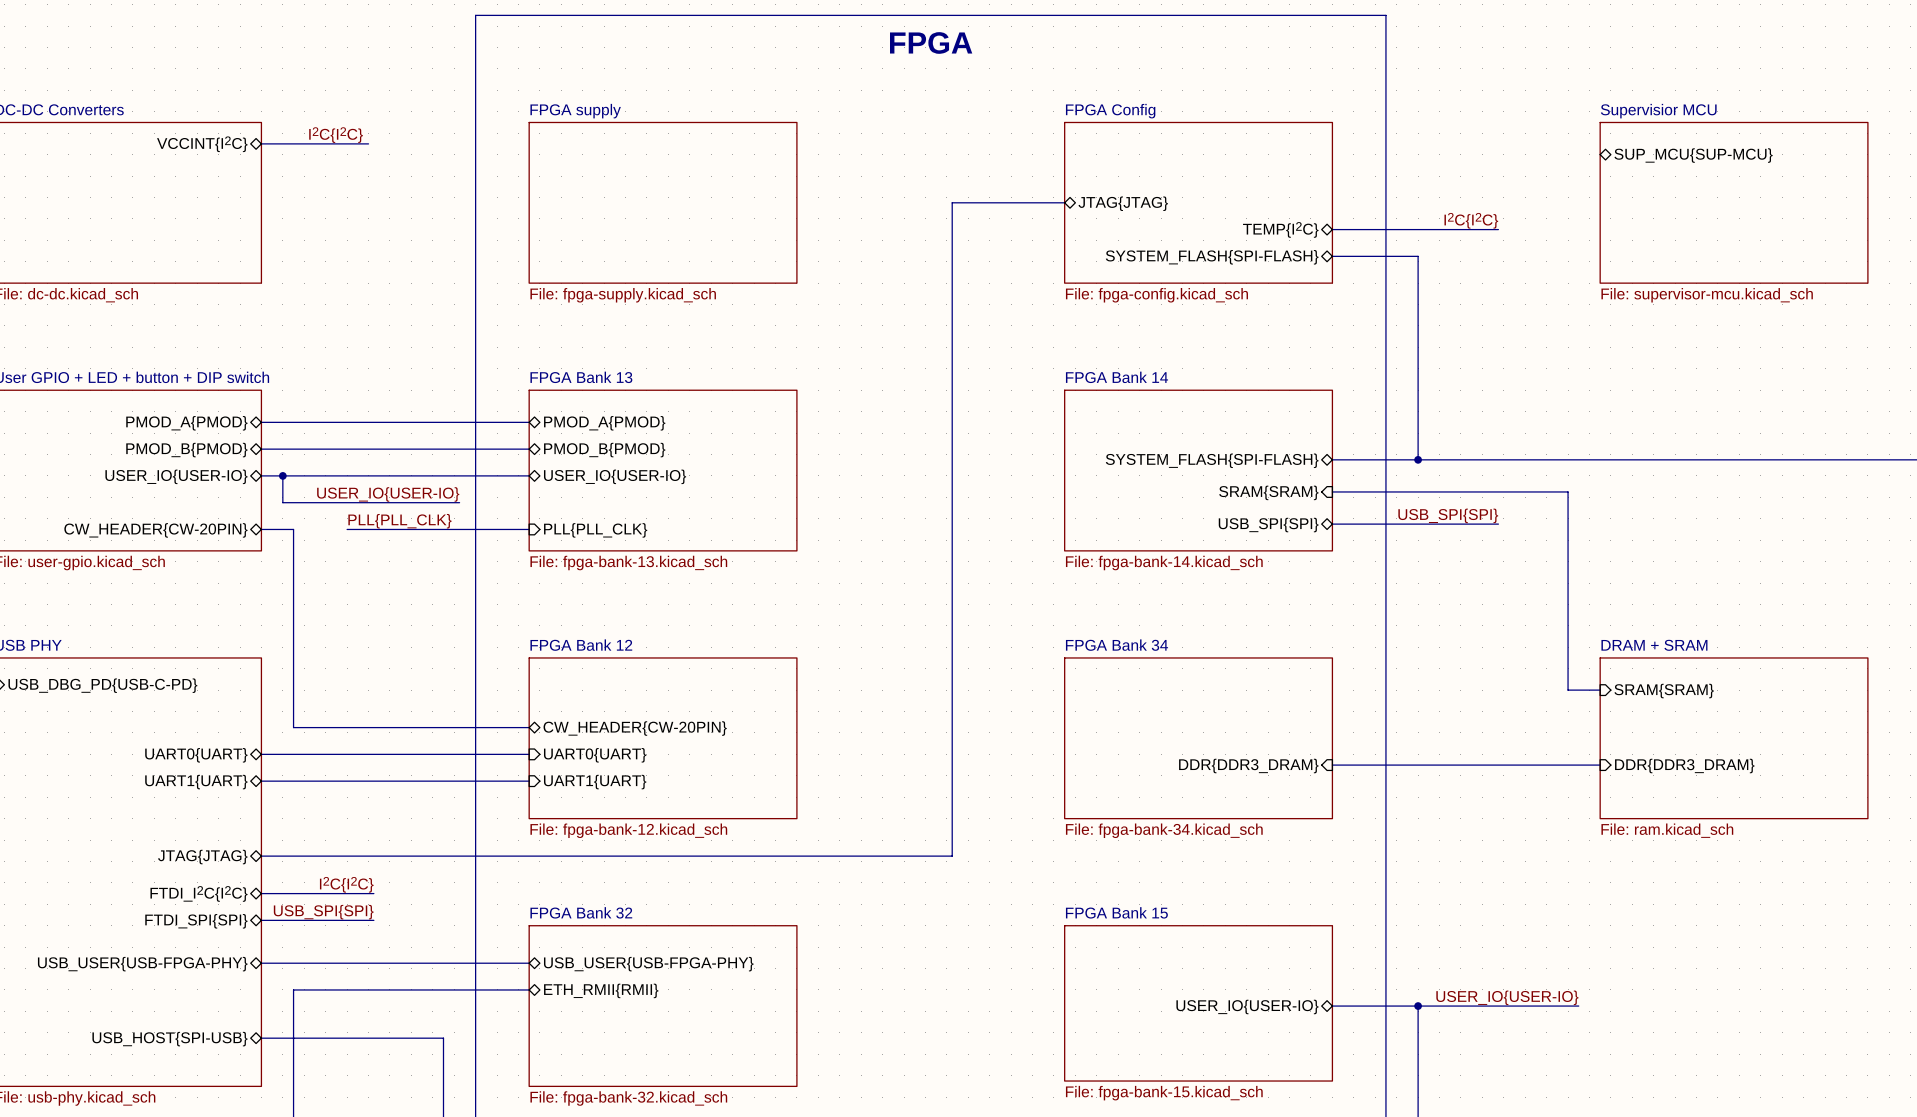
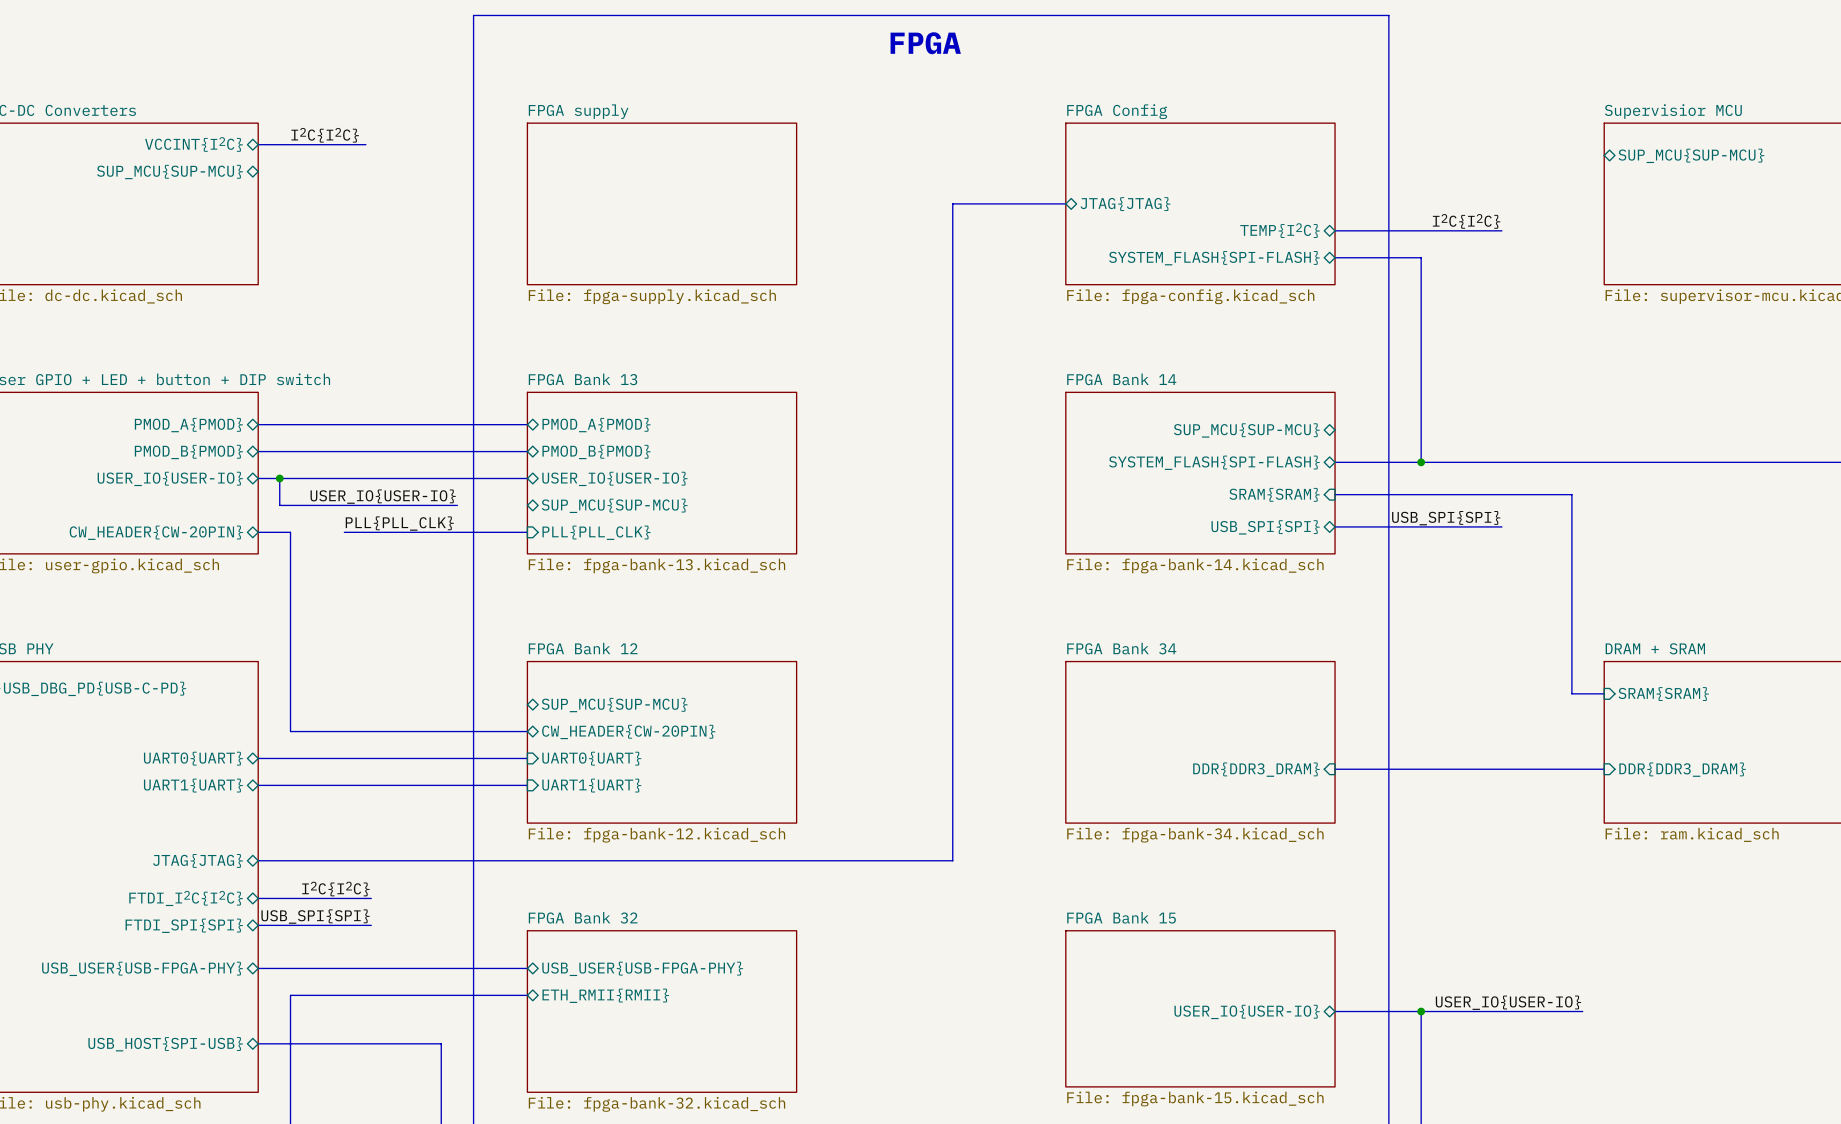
sheet pin: none -> SUP_MCU{SUP-MCU} (170, 172)
sheet pin: none -> SUP_MCU{SUP-MCU} (1246, 430)
sheet pin: none -> SUP_MCU{SUP-MCU} (614, 505)
sheet pin: none -> SUP_MCU{SUP-MCU} (614, 705)

